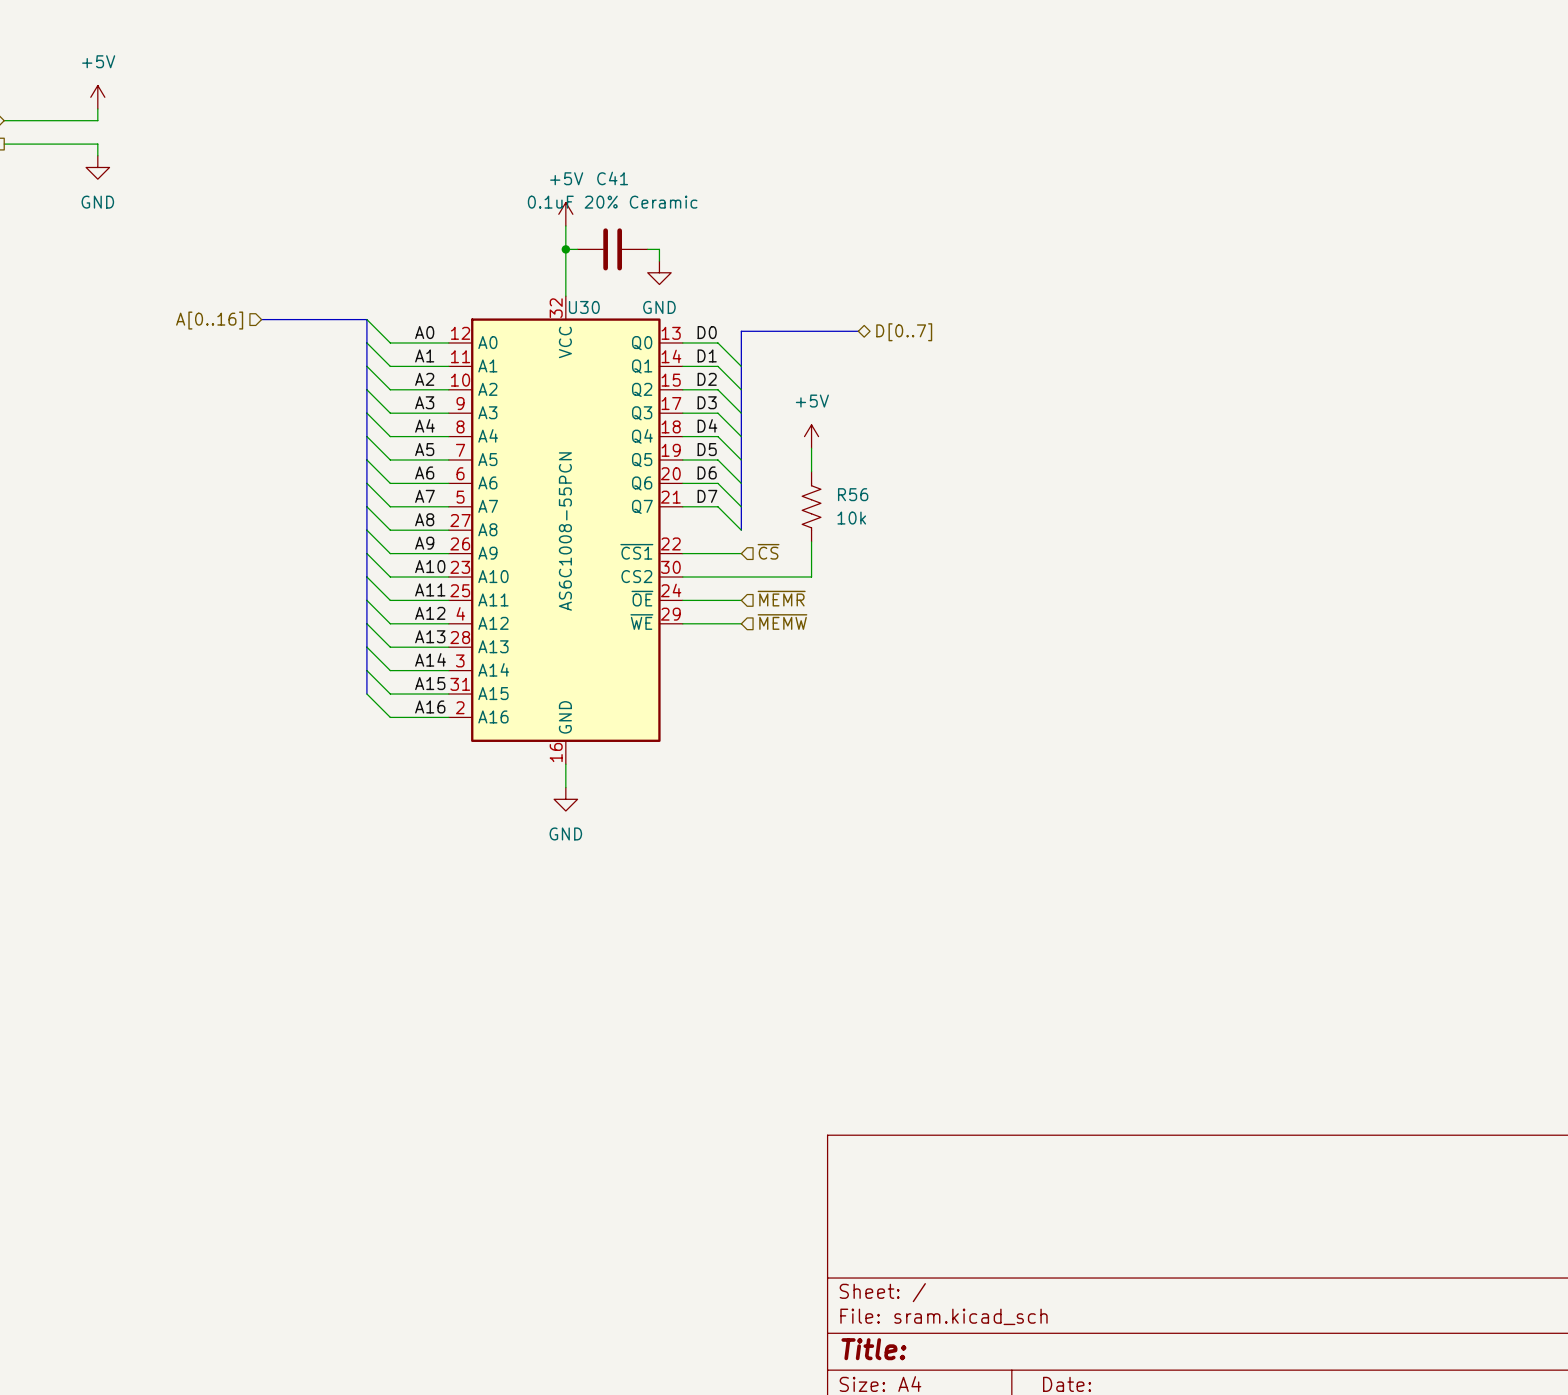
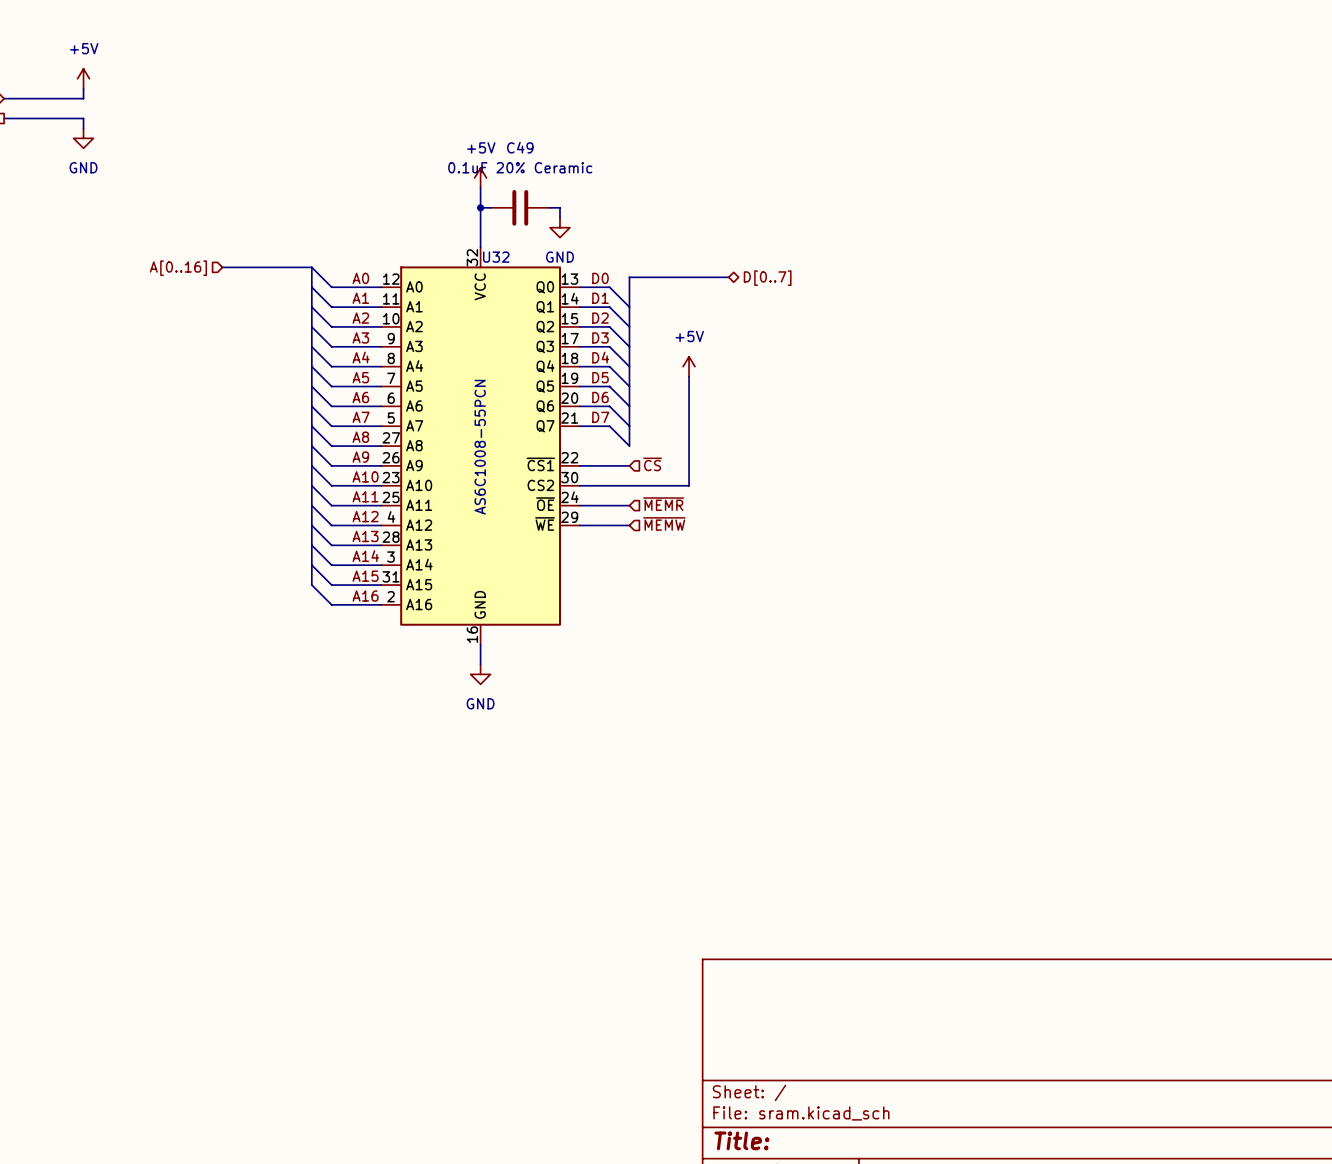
C41 name: C41 (612, 178) -> C49 (520, 147)
U30 name: U30 (584, 307) -> U32 (496, 257)
R56: 10k (811, 506) -> none

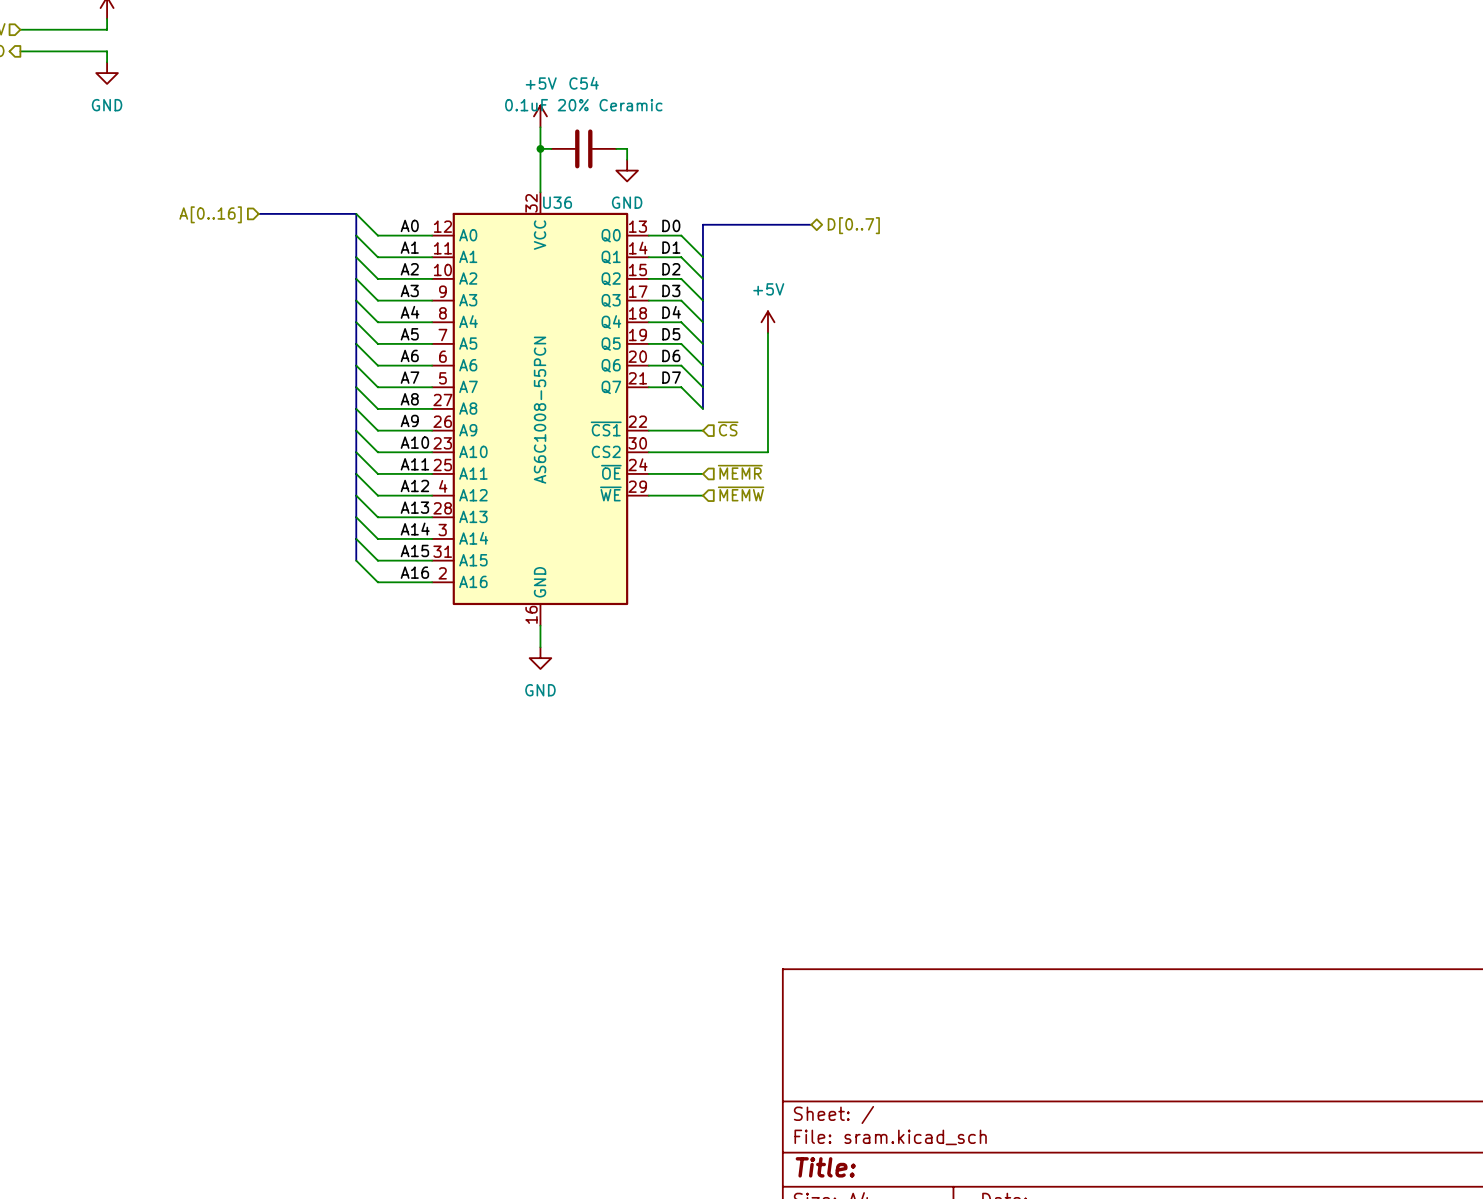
C49 name: C49 (520, 147) -> C54 (584, 83)
U32 name: U32 (496, 257) -> U36 (557, 202)

